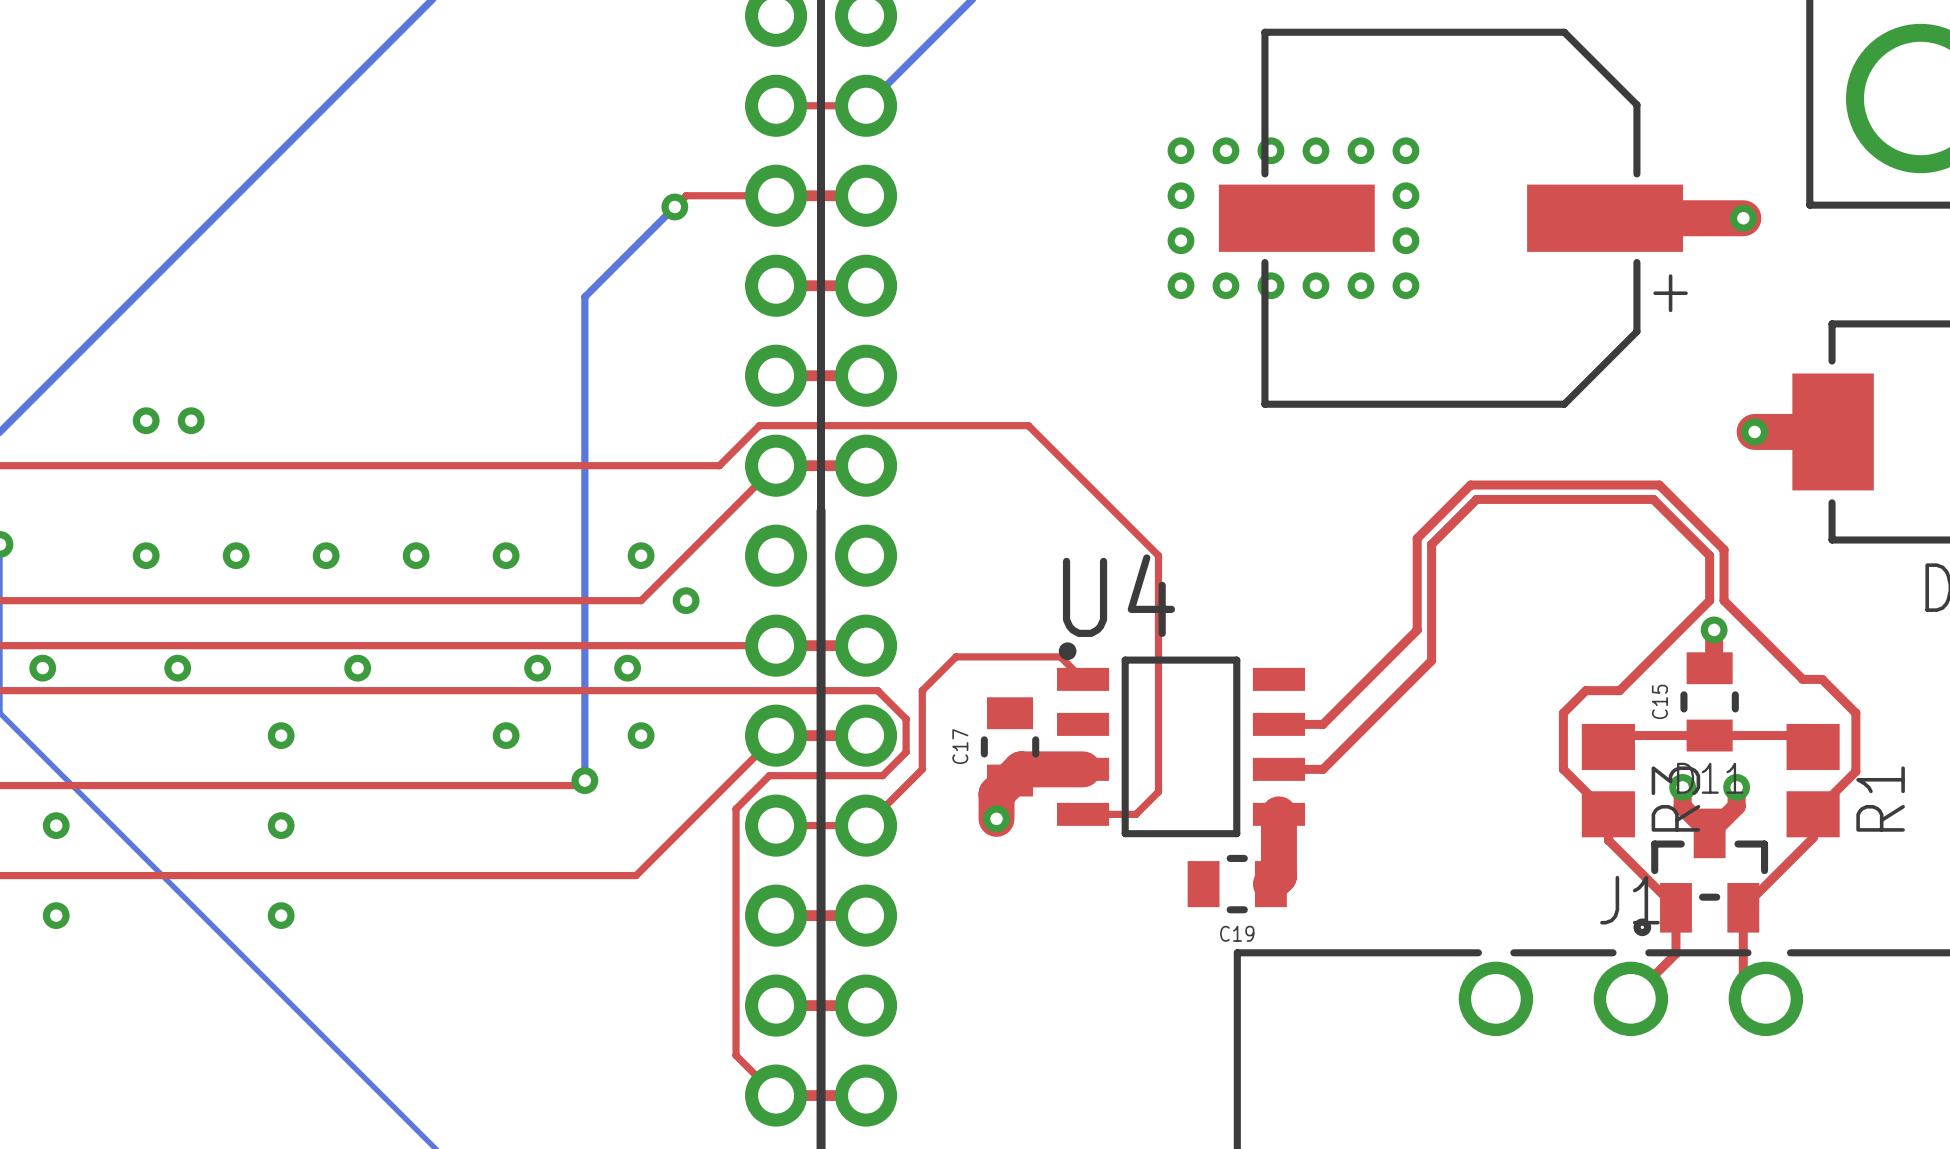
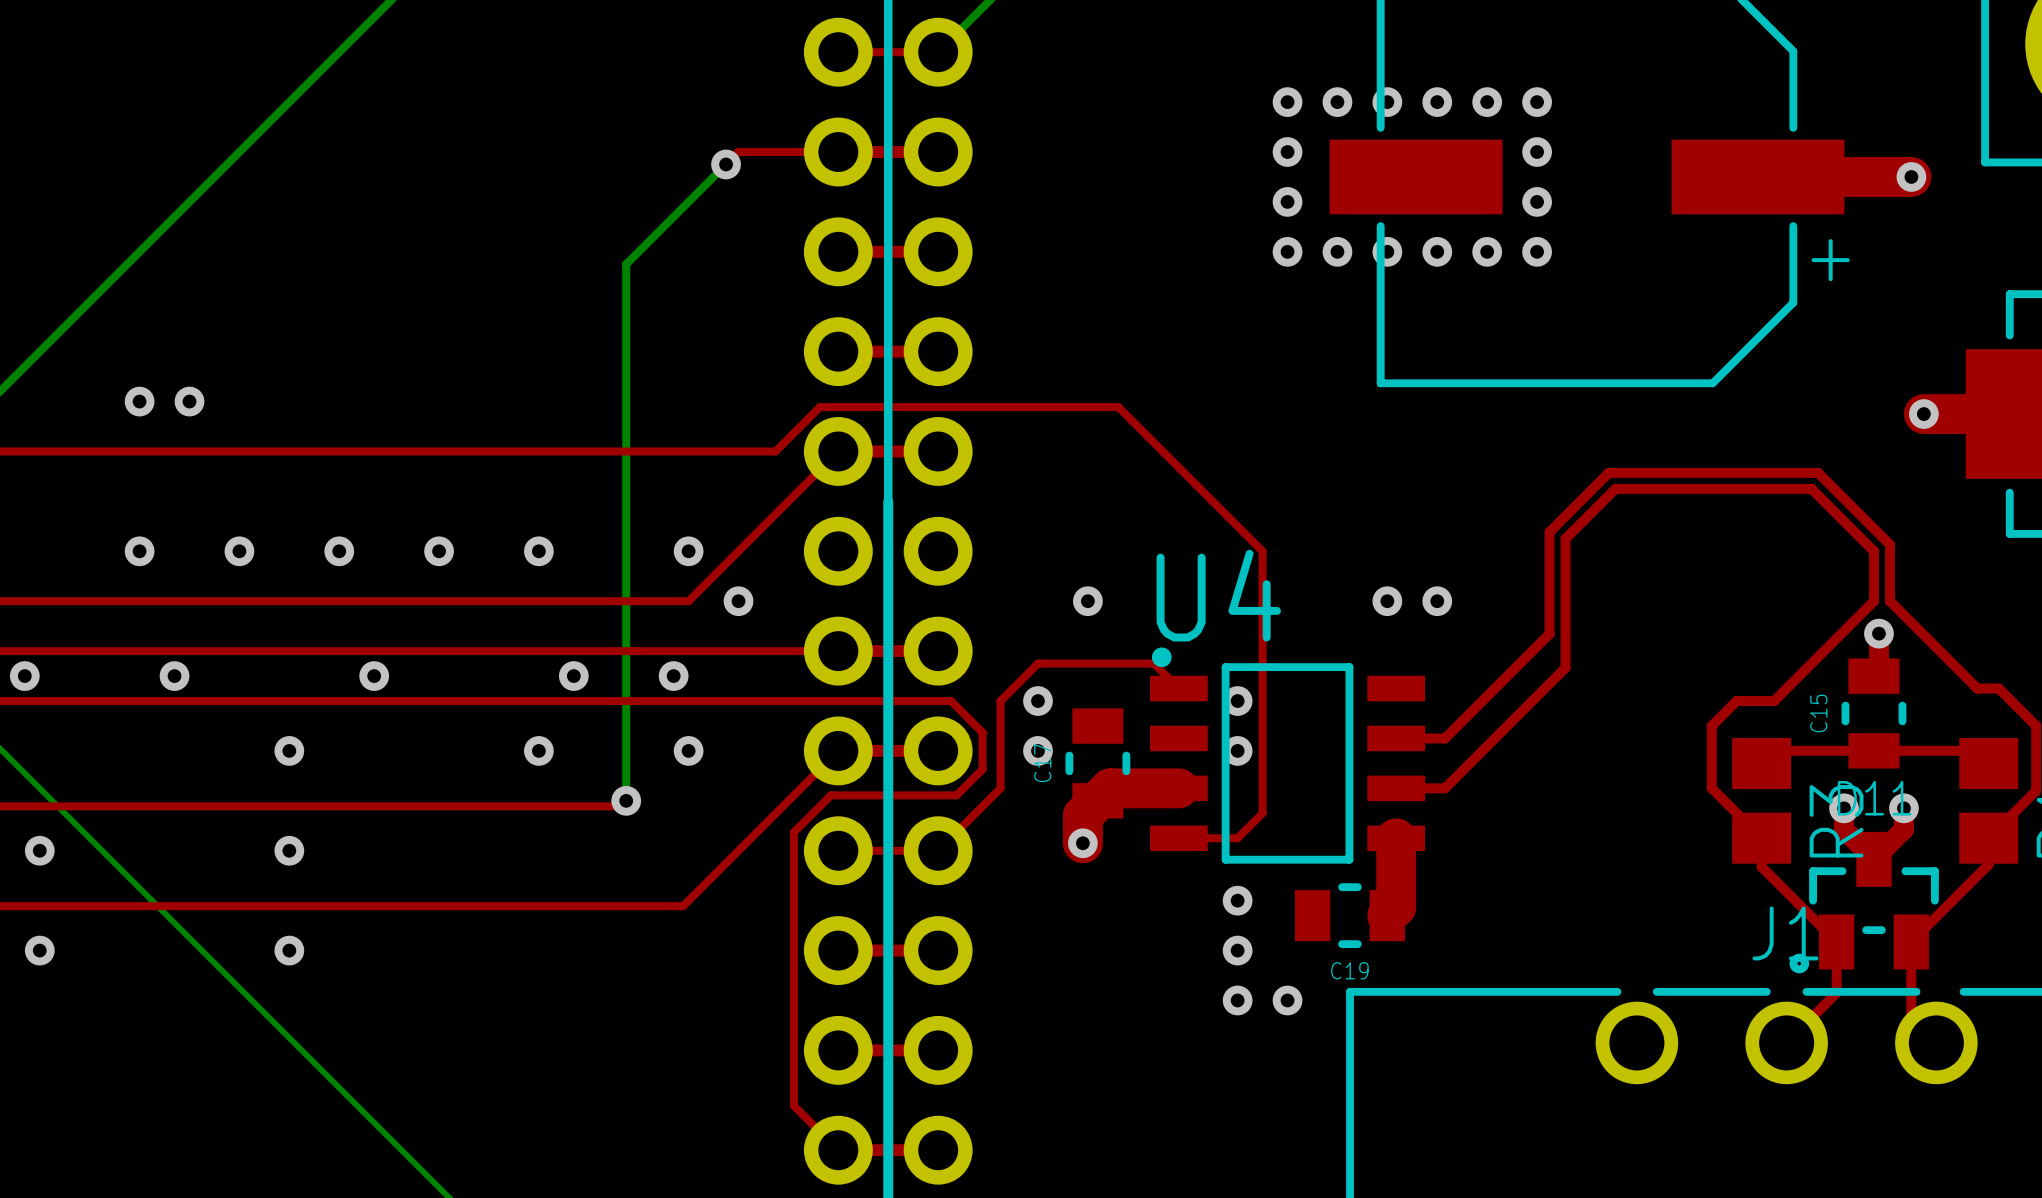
via: none -> (1087, 601)
via: none -> (1387, 601)
via: none -> (1437, 601)
via: none -> (1037, 701)
via: none -> (1237, 701)
via: none -> (1037, 750)
via: none -> (1237, 750)
via: none -> (1237, 900)
via: none -> (1237, 950)
via: none -> (1237, 1000)
via: none -> (1287, 1000)

